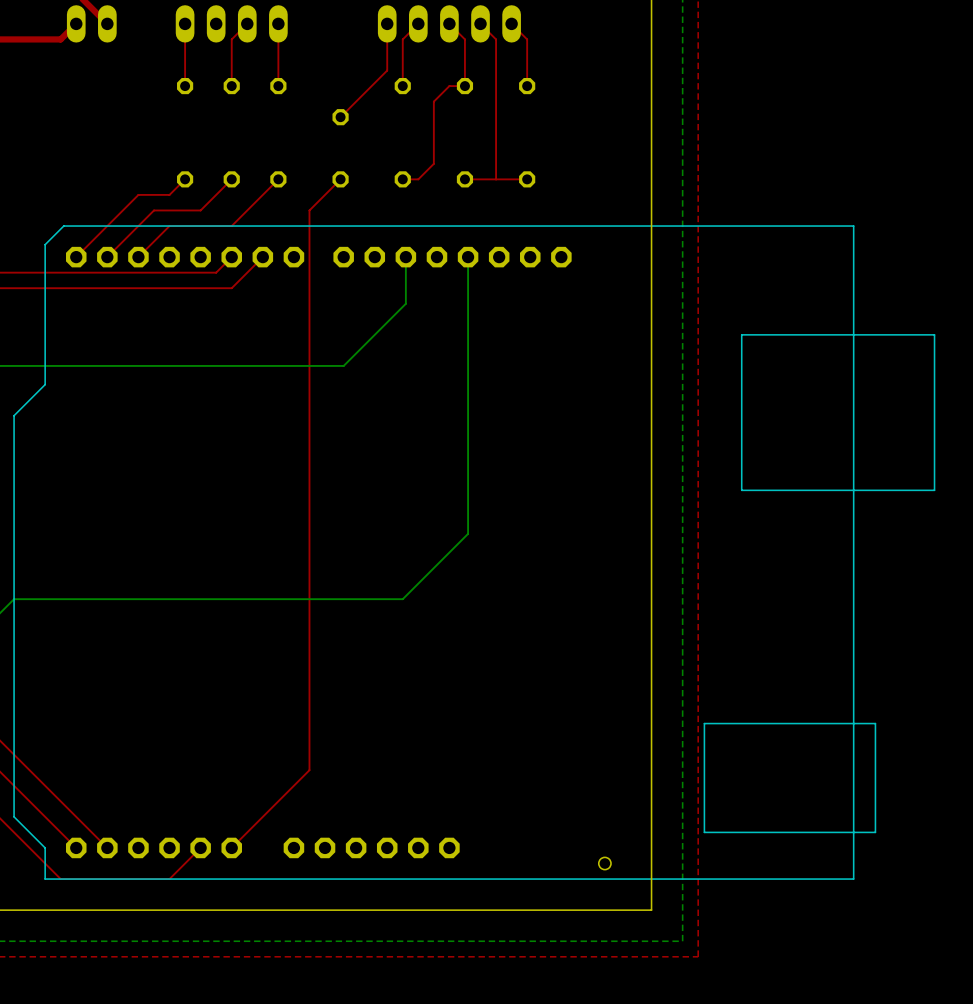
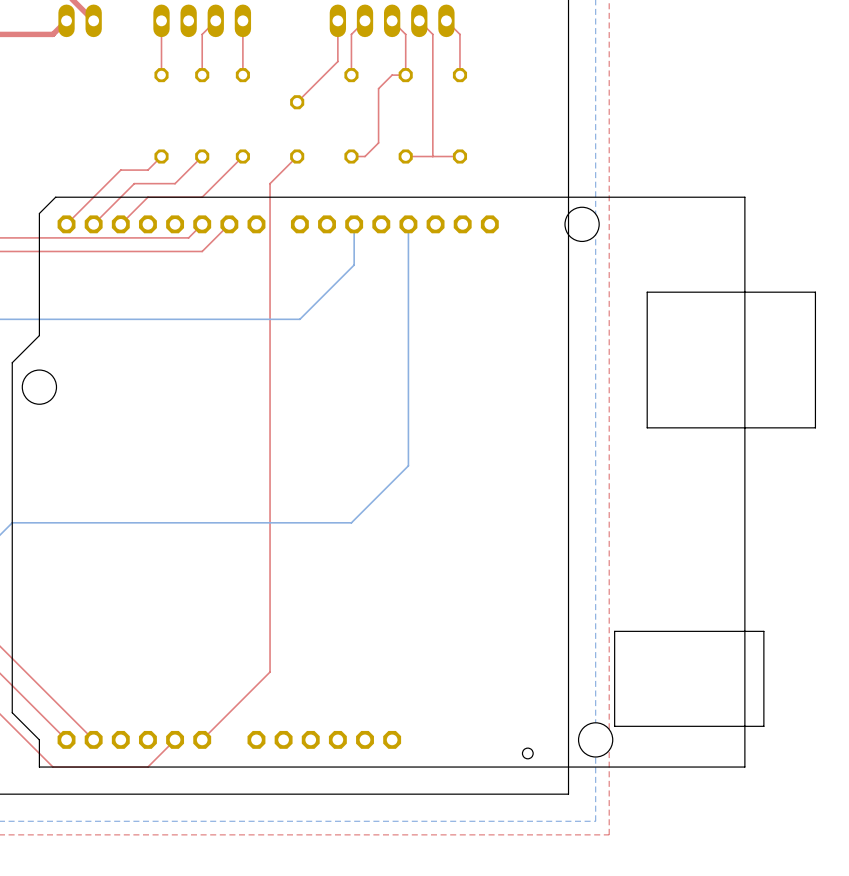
part footprint: [14, 226, 935, 880] -> [12, 197, 816, 768]

